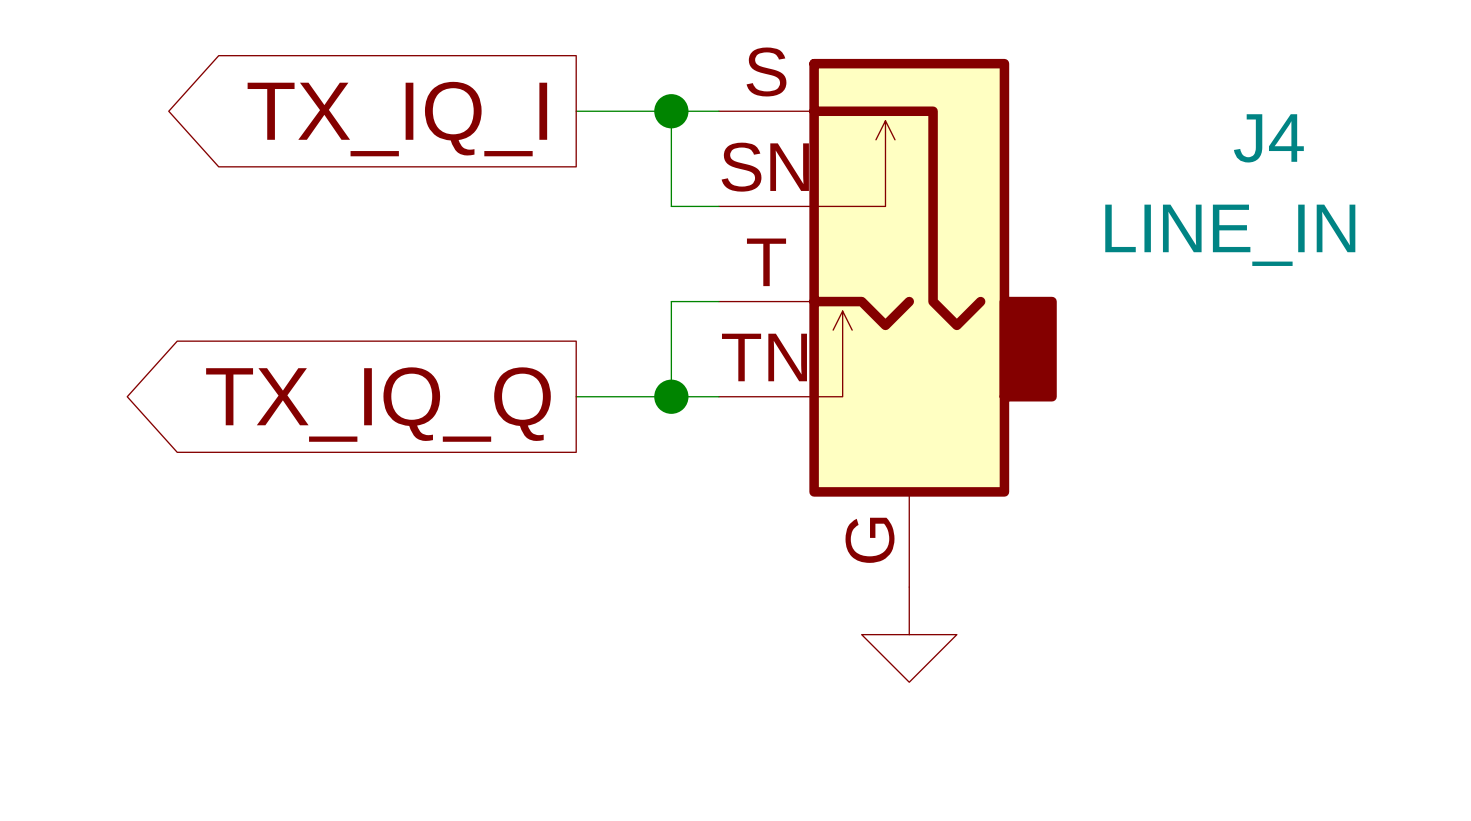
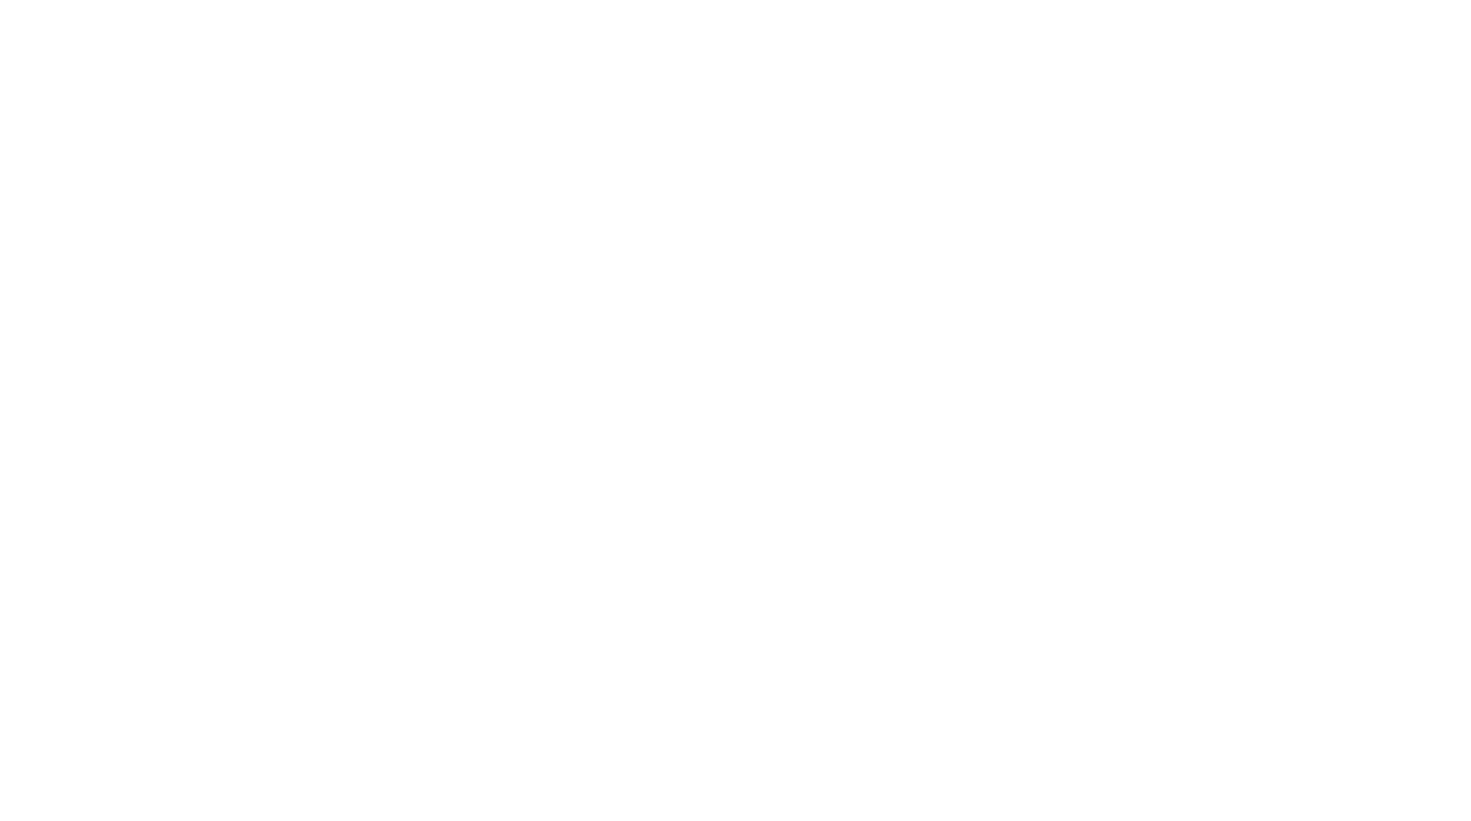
wire: (576, 111) (718, 111) -> none
wire: (671, 111) (671, 206) (718, 206) -> none
junction: (671, 111) -> none
global label: TX_IQ_I (397, 119) -> none
wire: (718, 301) (671, 301) (671, 396) -> none
J4: LINE_IN (887, 322) -> none
wire: (576, 396) (718, 396) -> none
junction: (671, 396) -> none
global label: TX_IQ_Q (378, 404) -> none
power symbol: (909, 634) -> none

